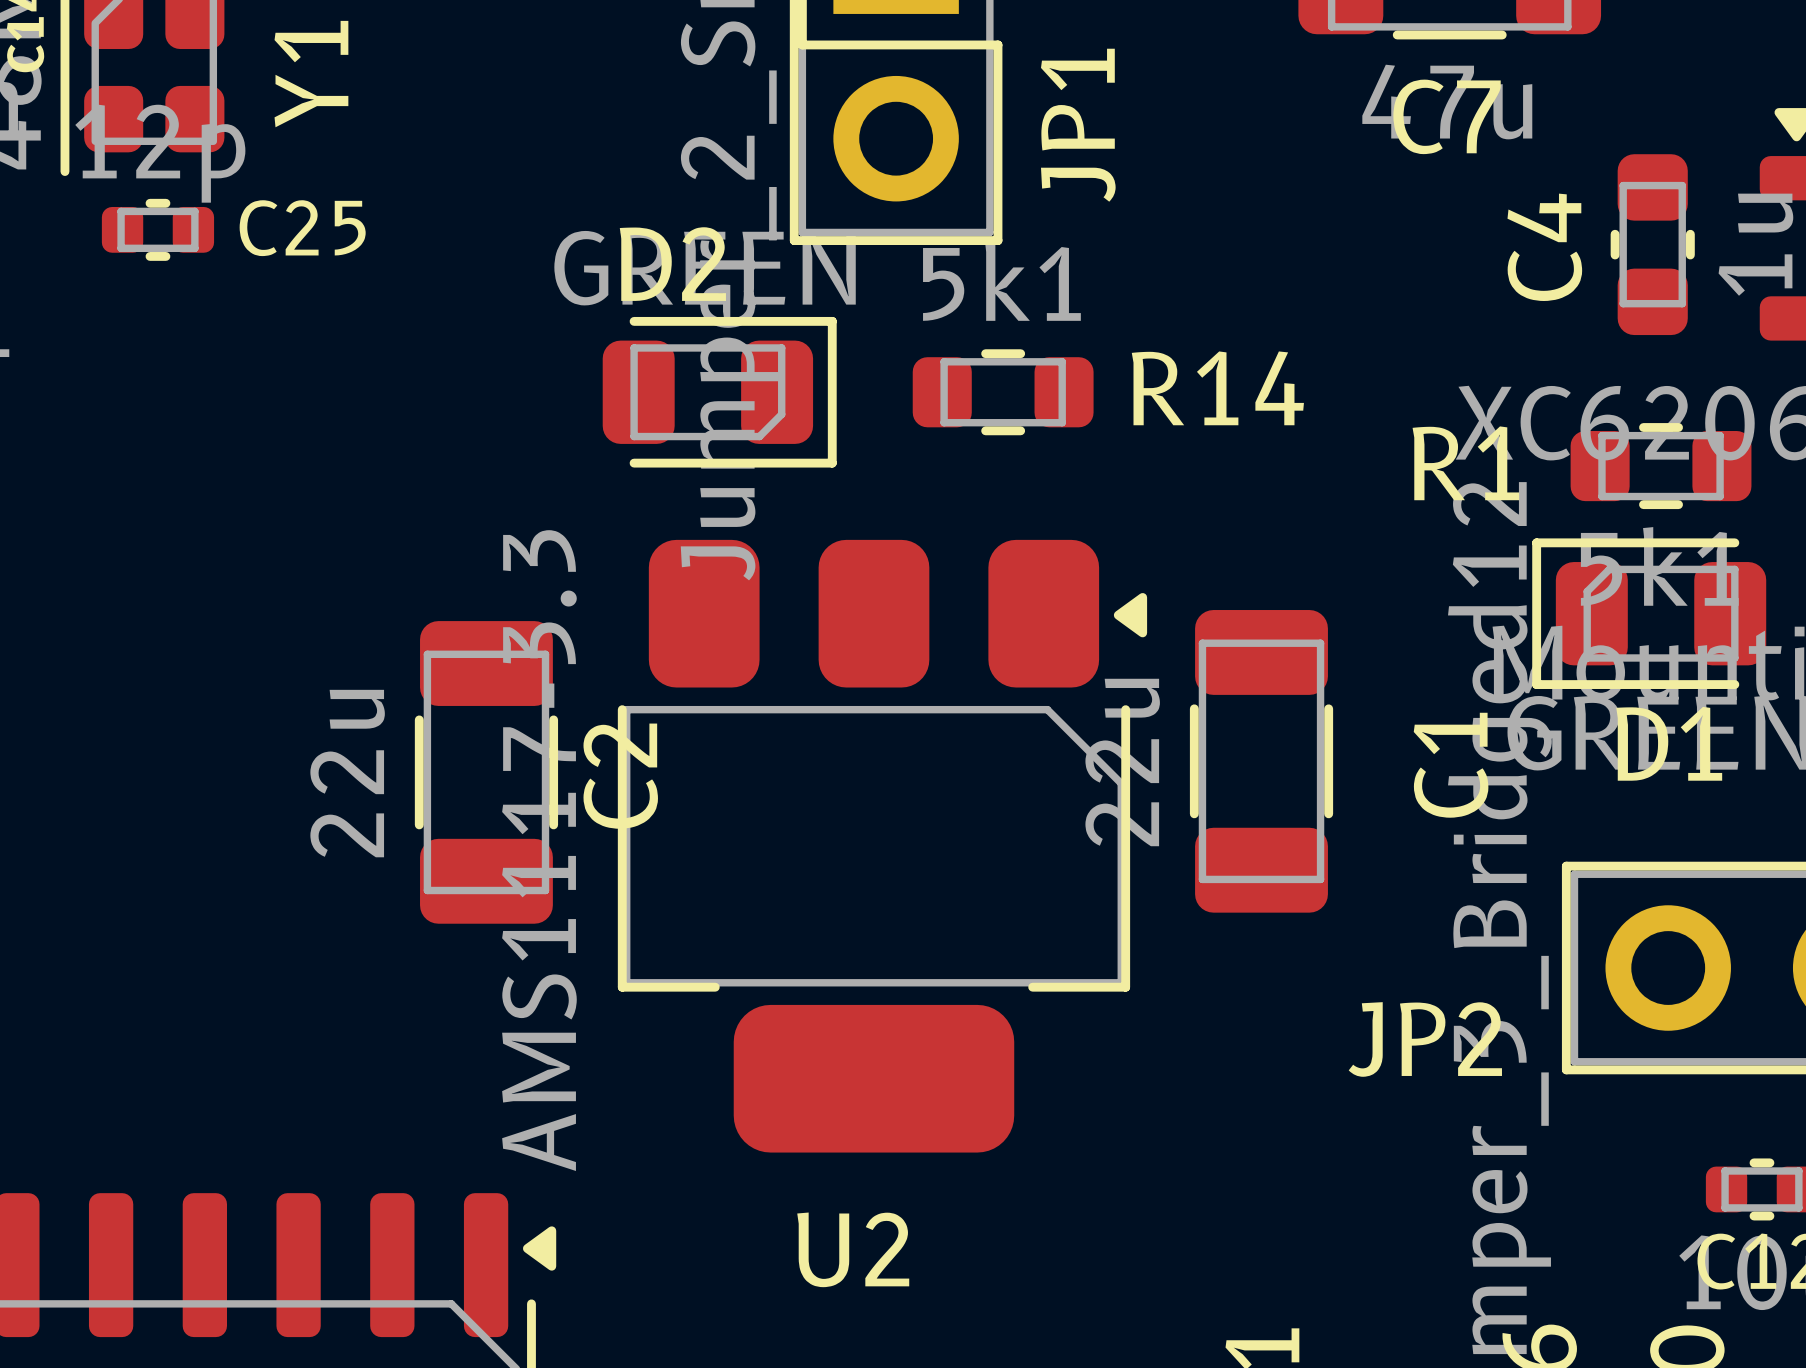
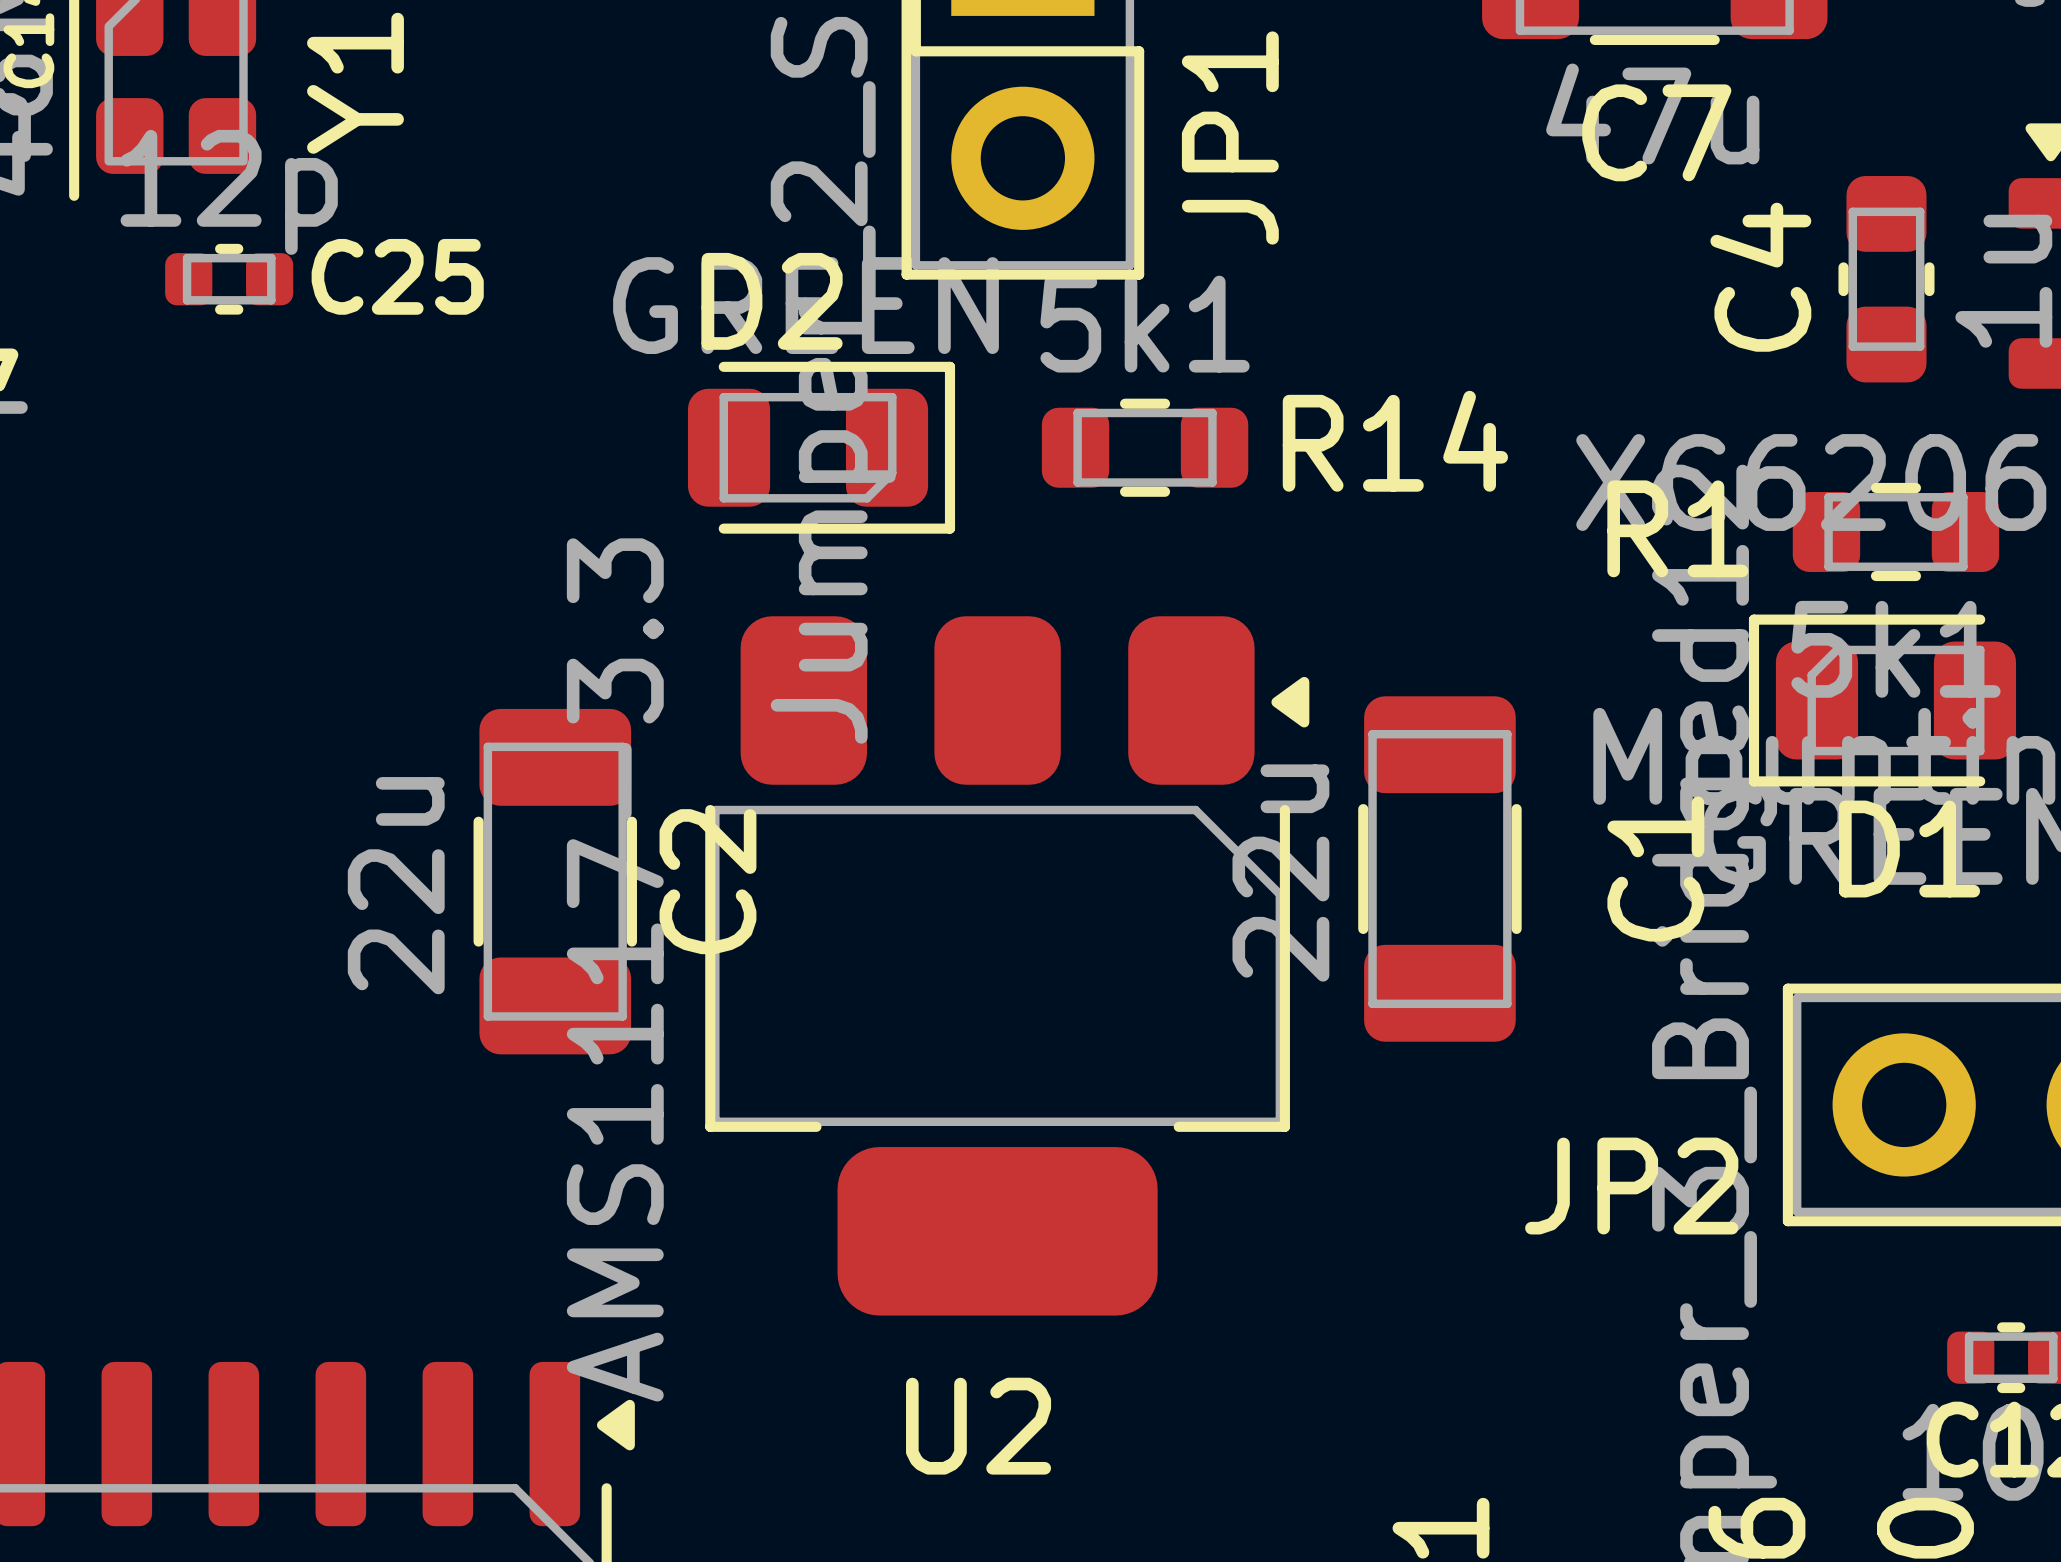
C25 position: (157, 229) -> (229, 279)

